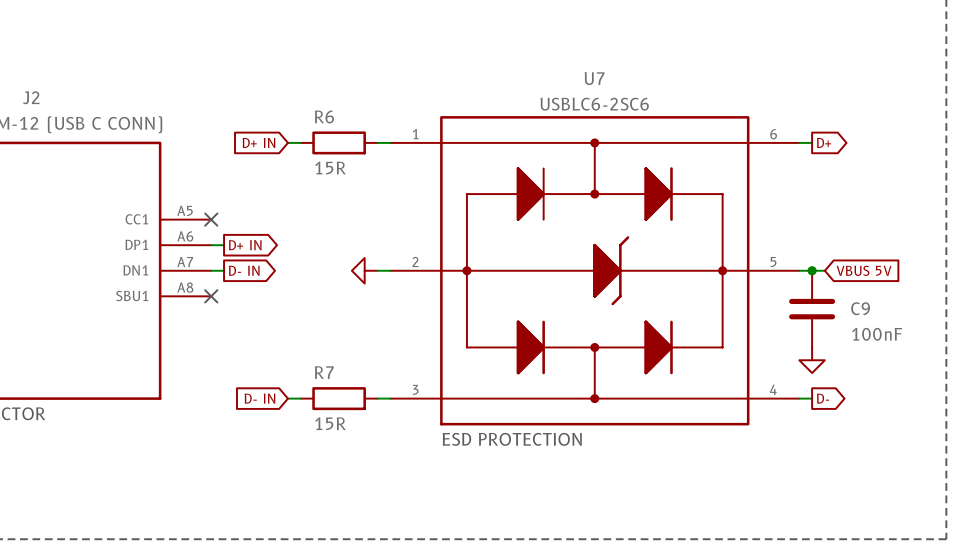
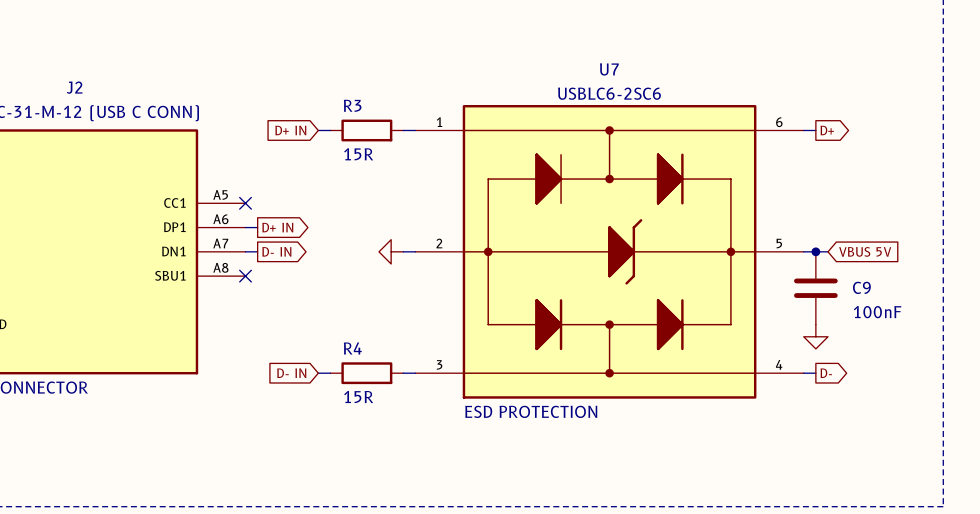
R6 name: R6 (324, 116) -> R3 (352, 105)
R7 name: R7 (324, 372) -> R4 (352, 348)

